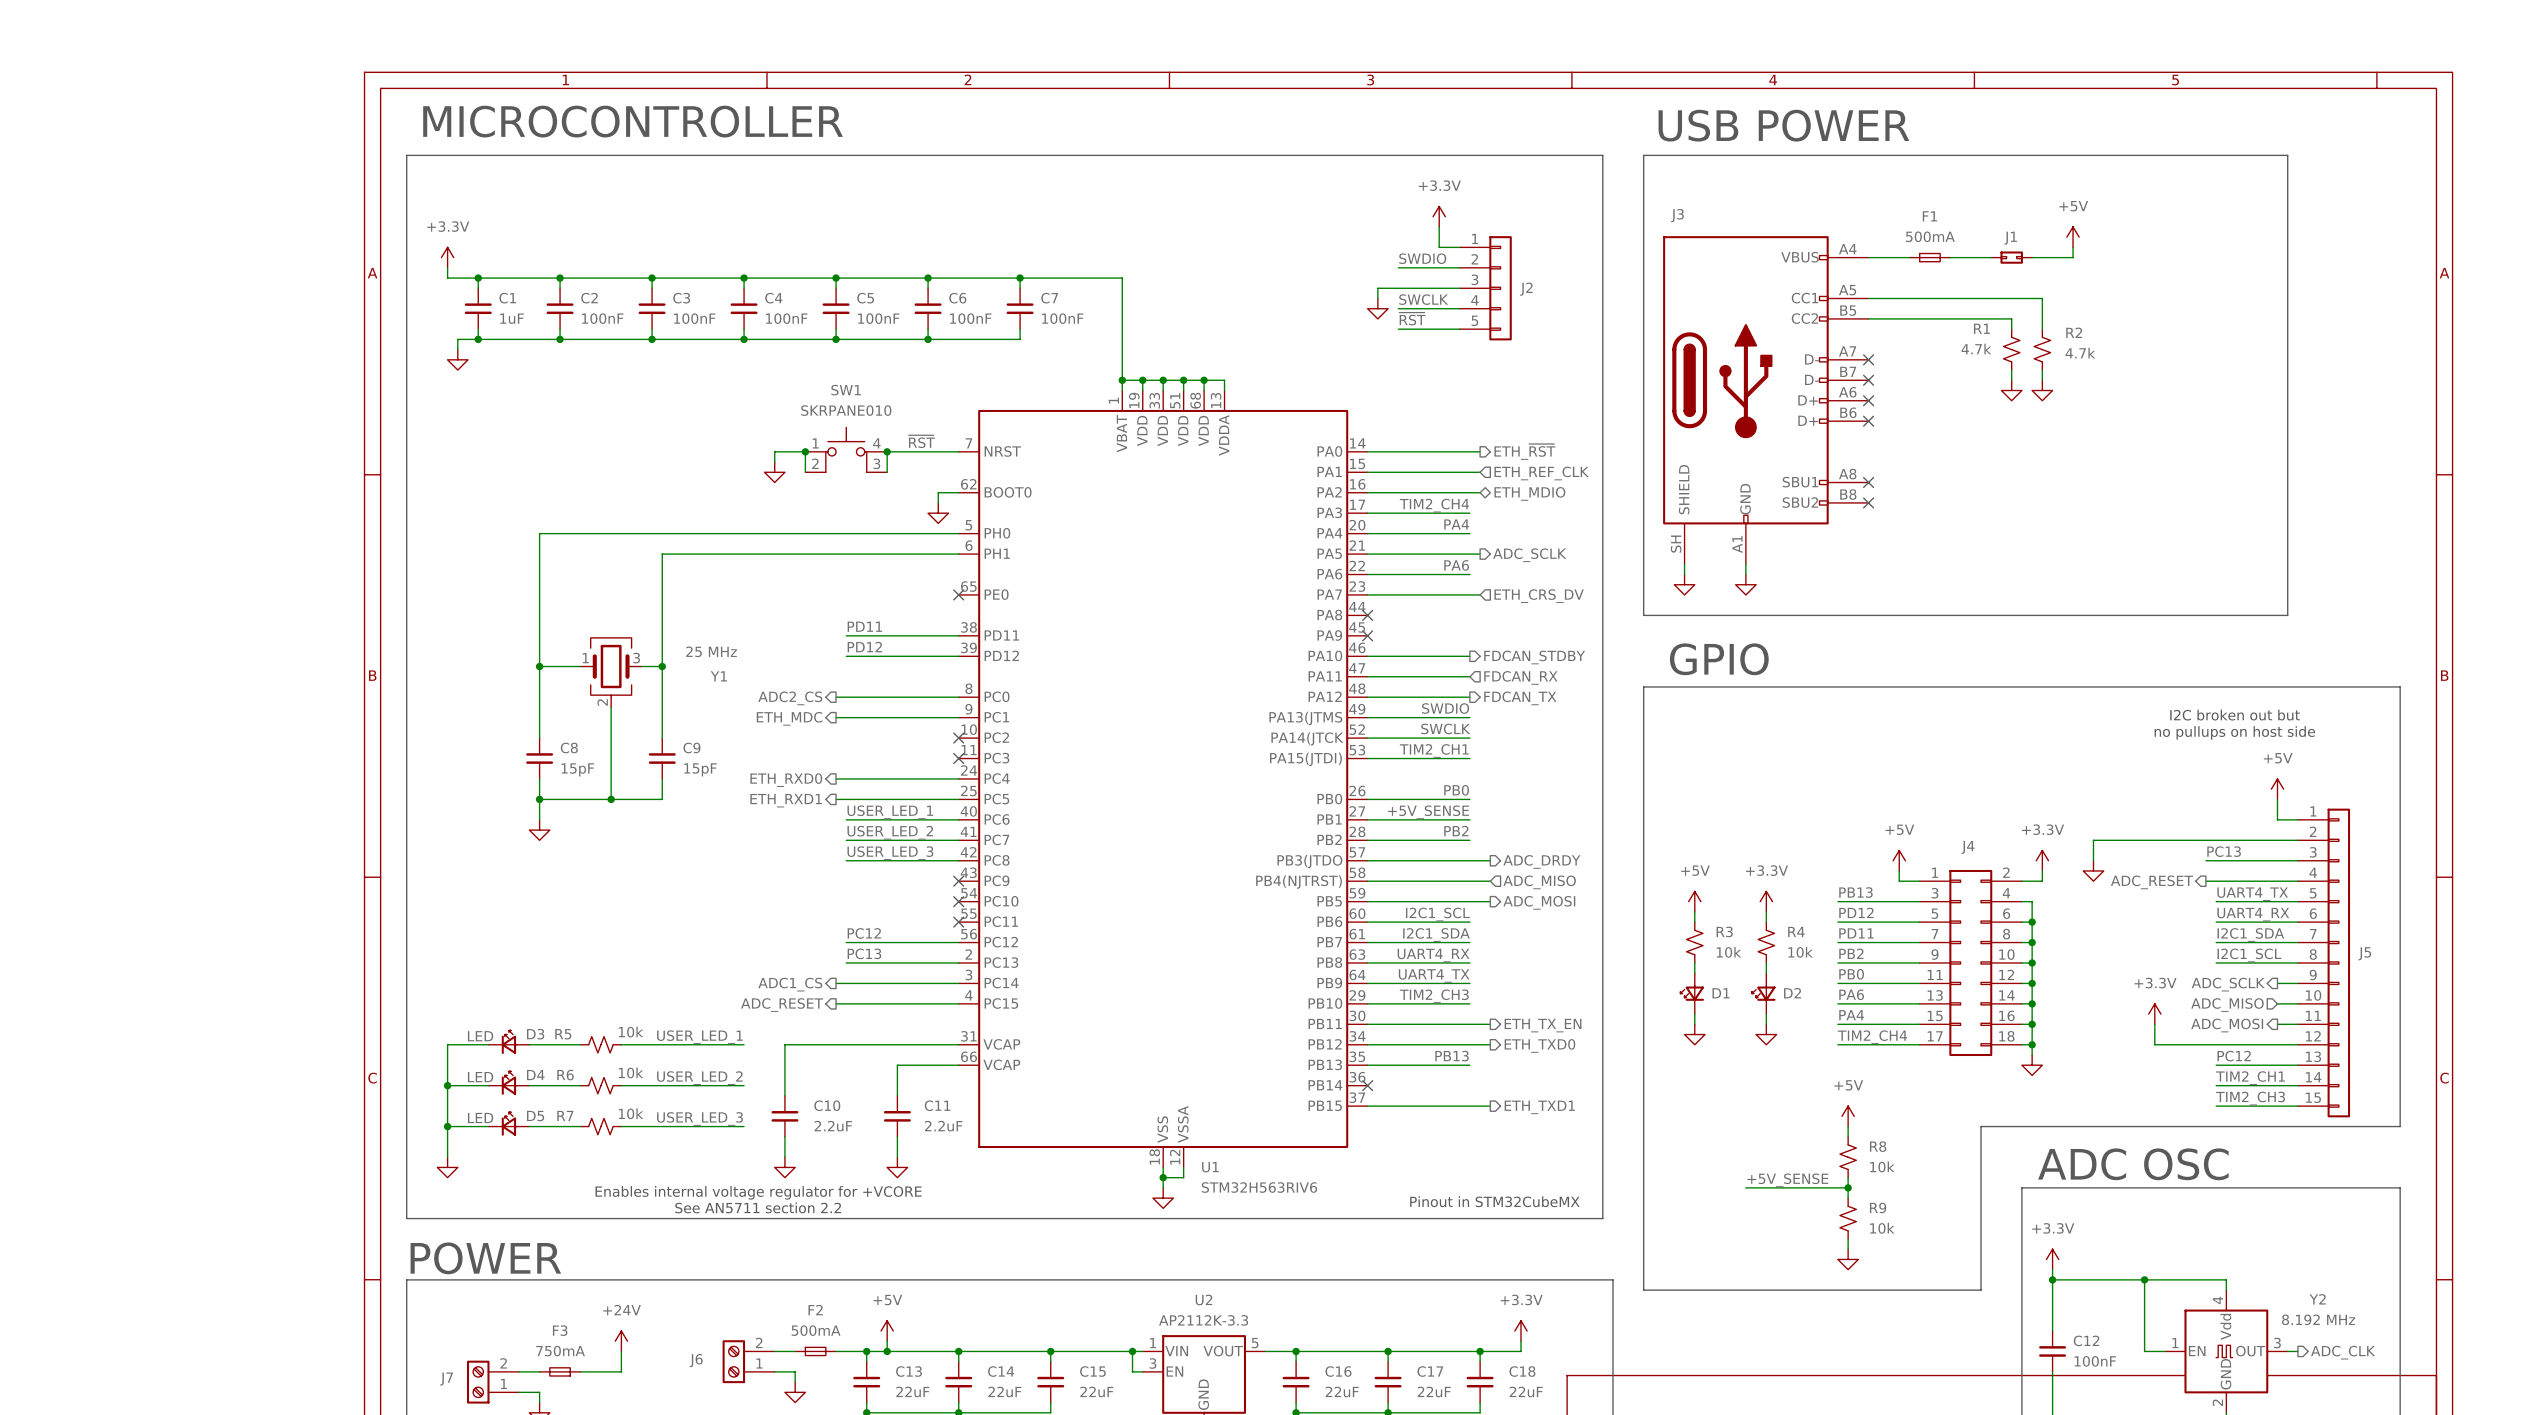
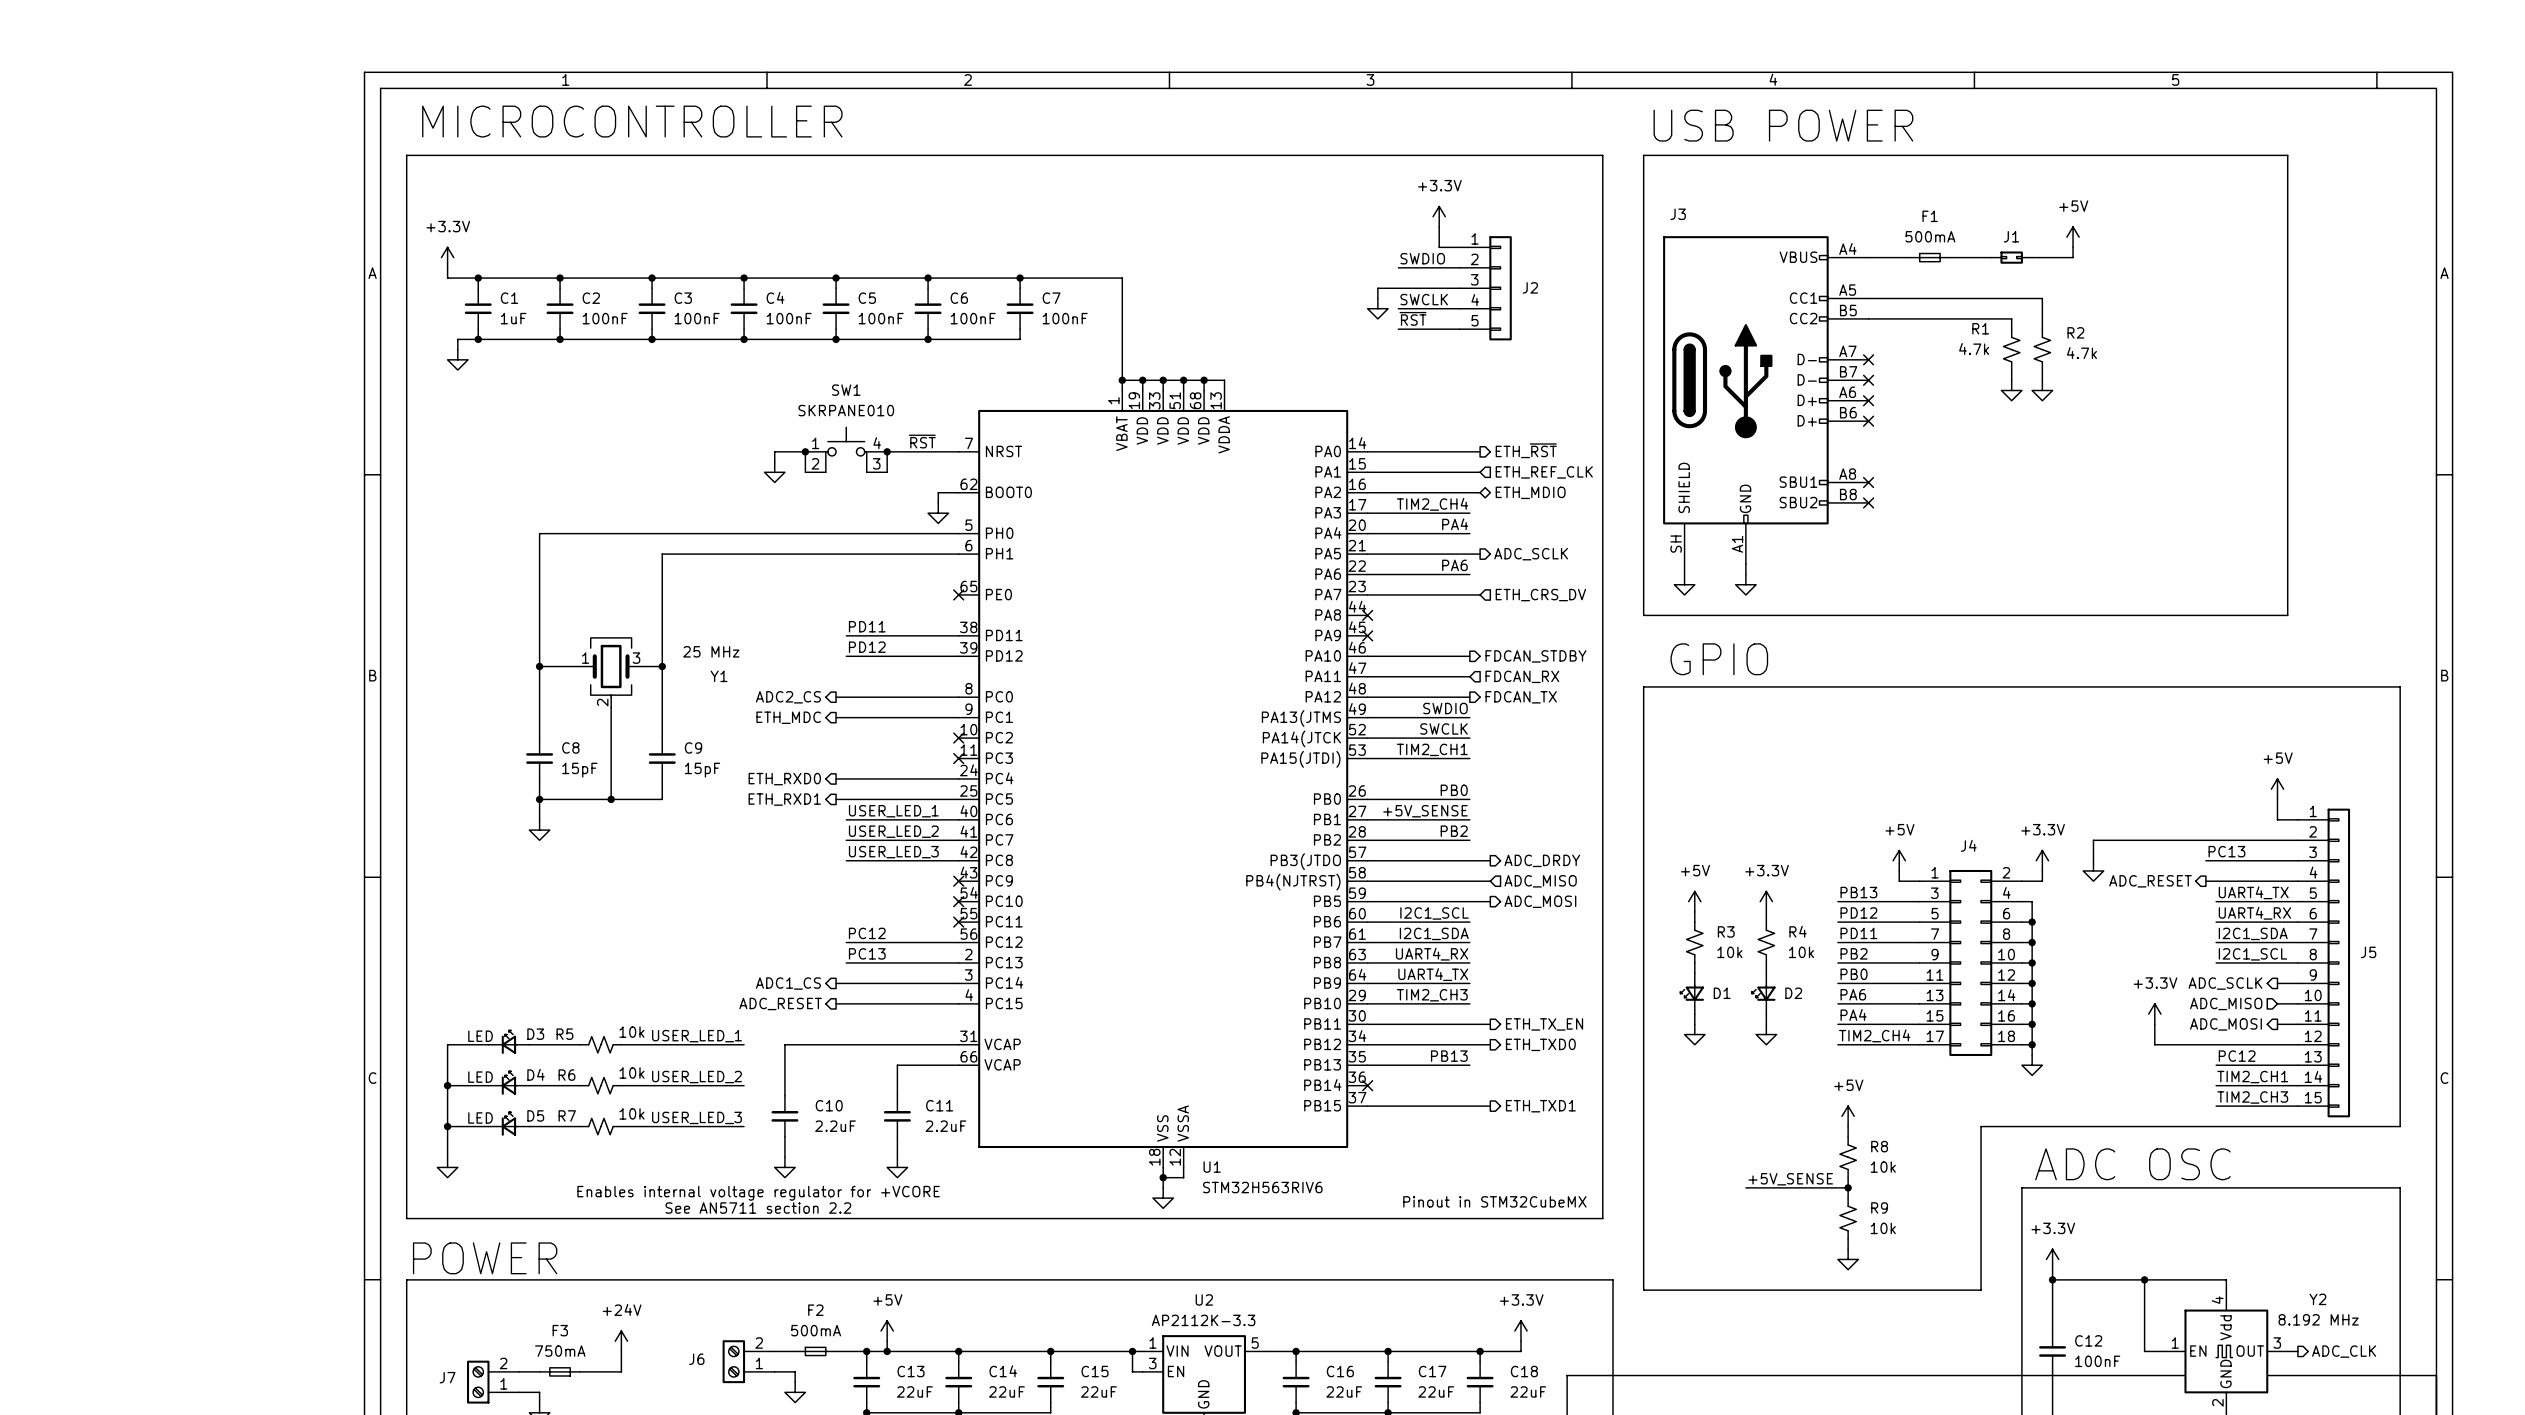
text: I2C broken out but (2235, 715) -> none
text: no pullups on host side (2234, 732) -> none

